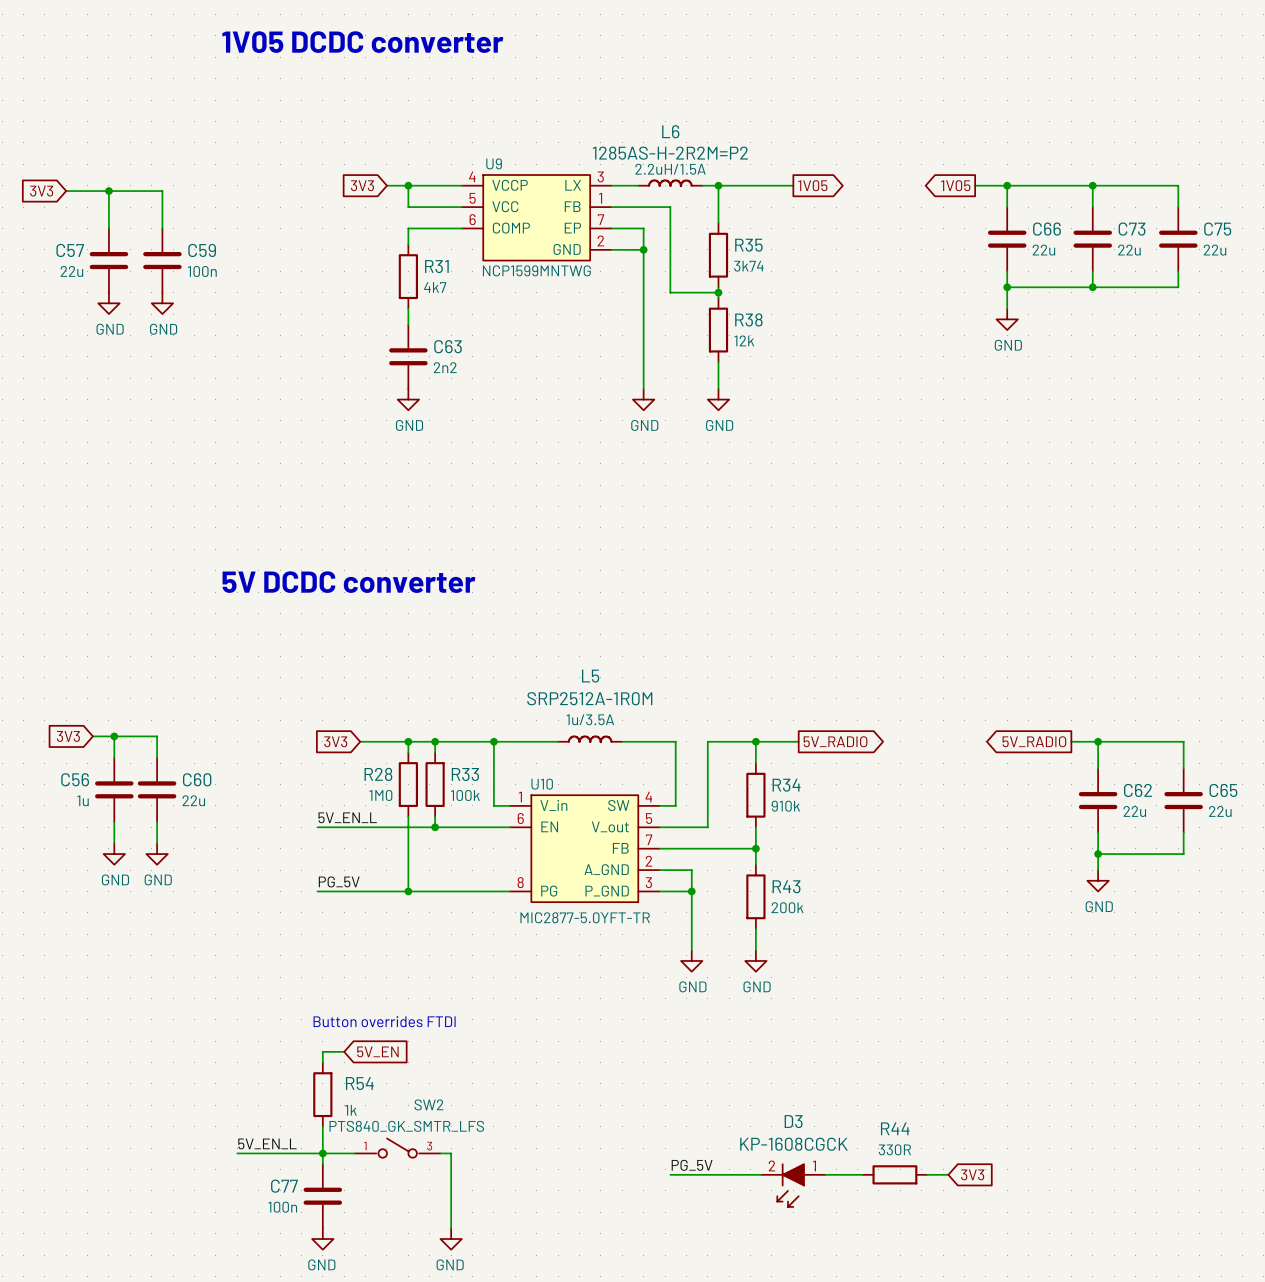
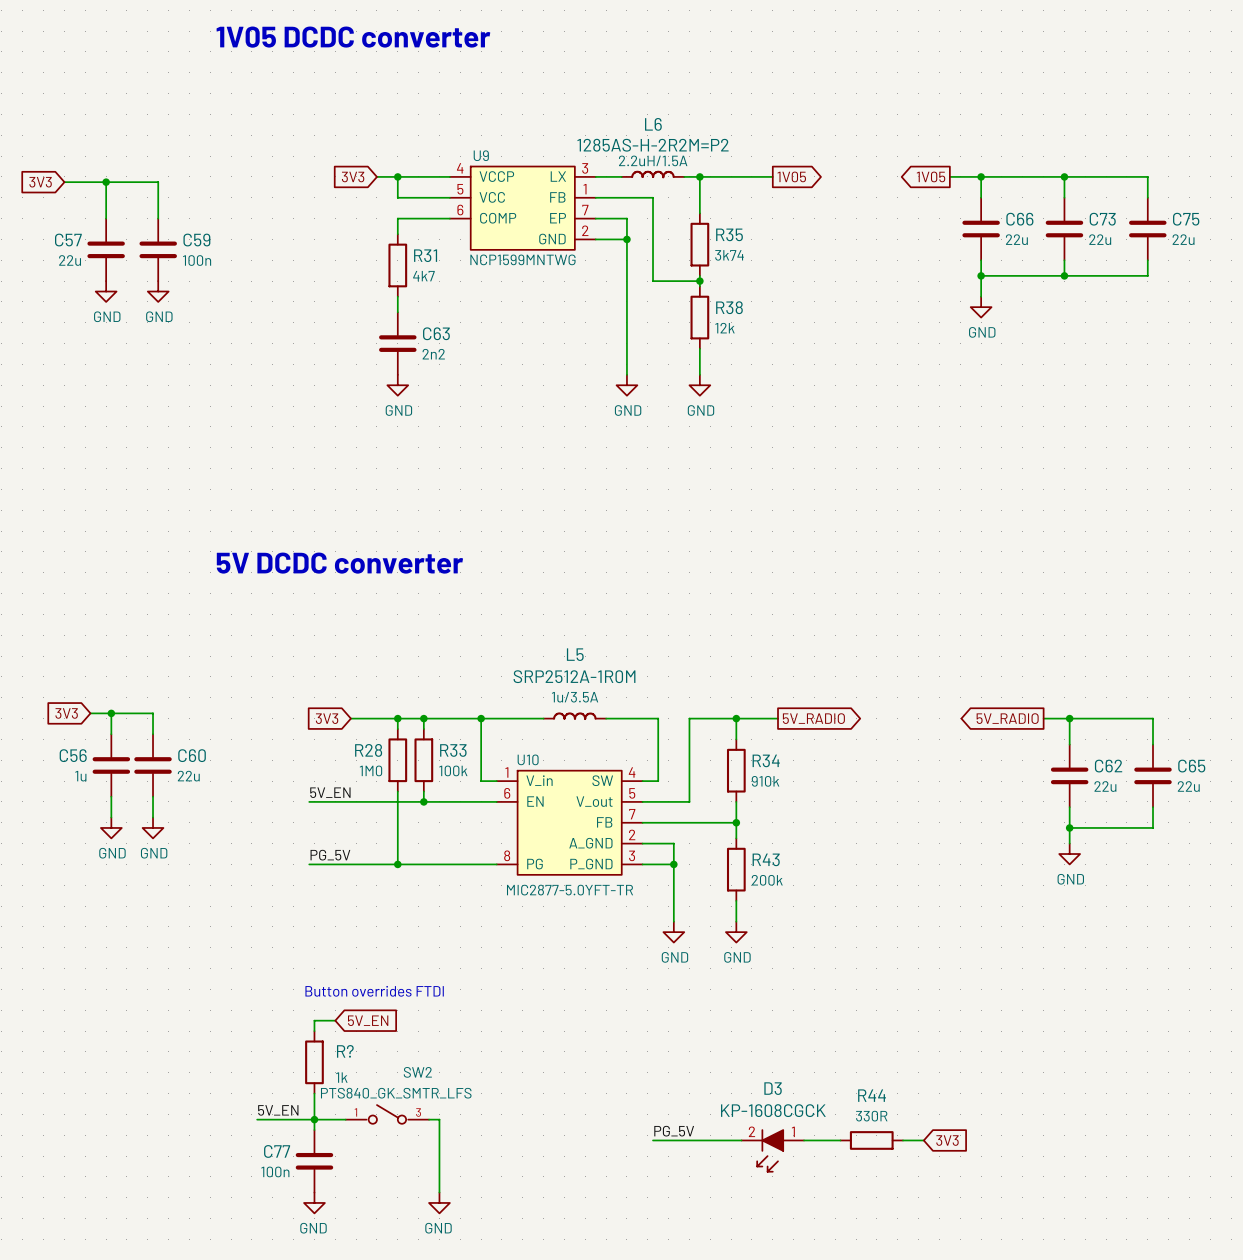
label: 5V_EN_L (347, 817) -> 5V_EN (330, 792)
R54 name: R54 (359, 1083) -> R? (345, 1051)
label: 5V_EN_L (267, 1143) -> 5V_EN (278, 1110)
wire: (237, 1153) (264, 1153) -> none

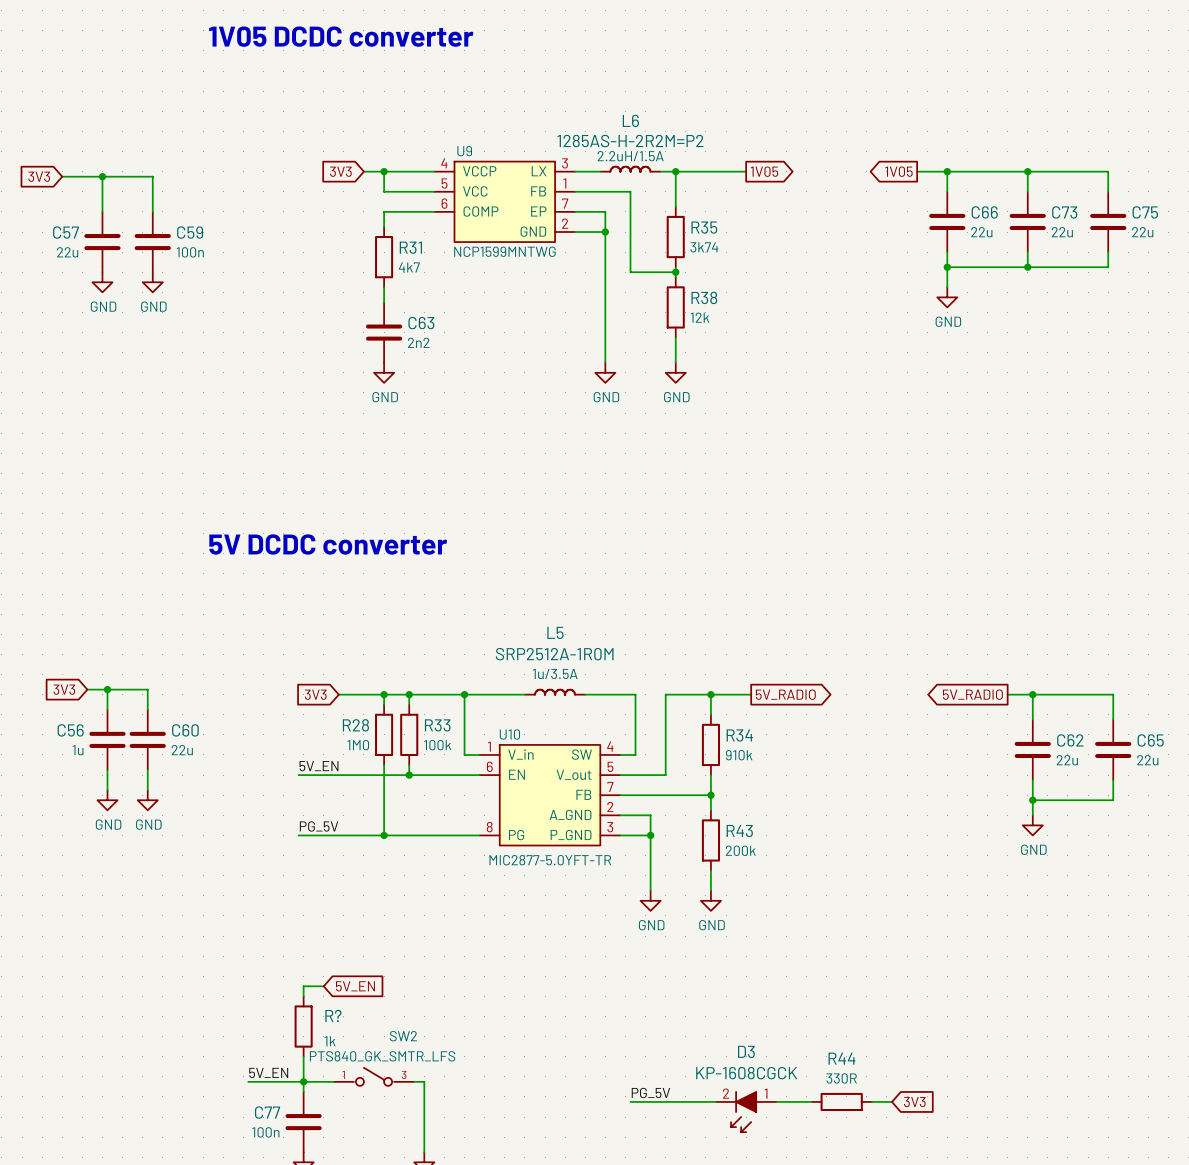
text: Button overrides FTDI (374, 991) -> none

